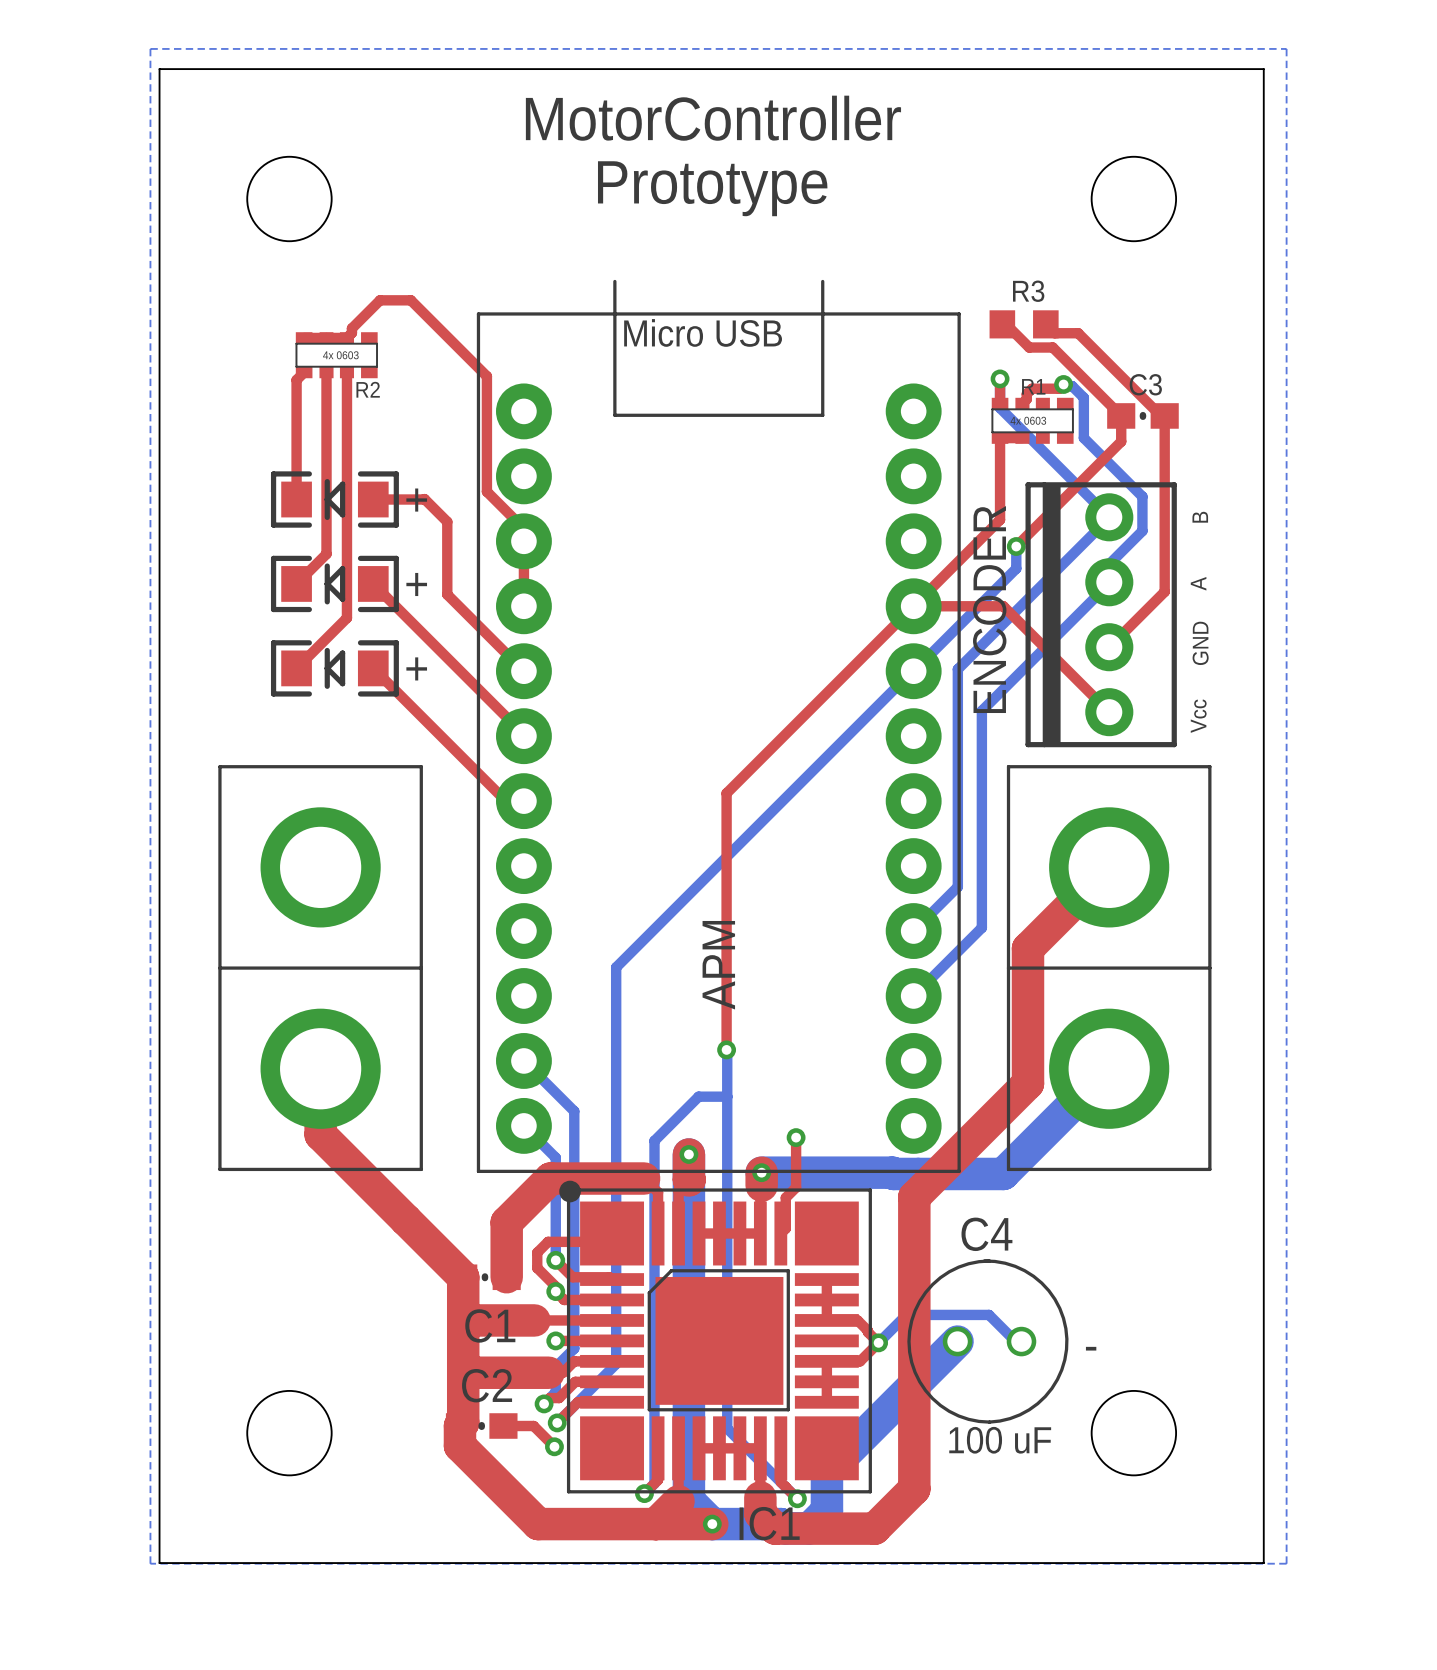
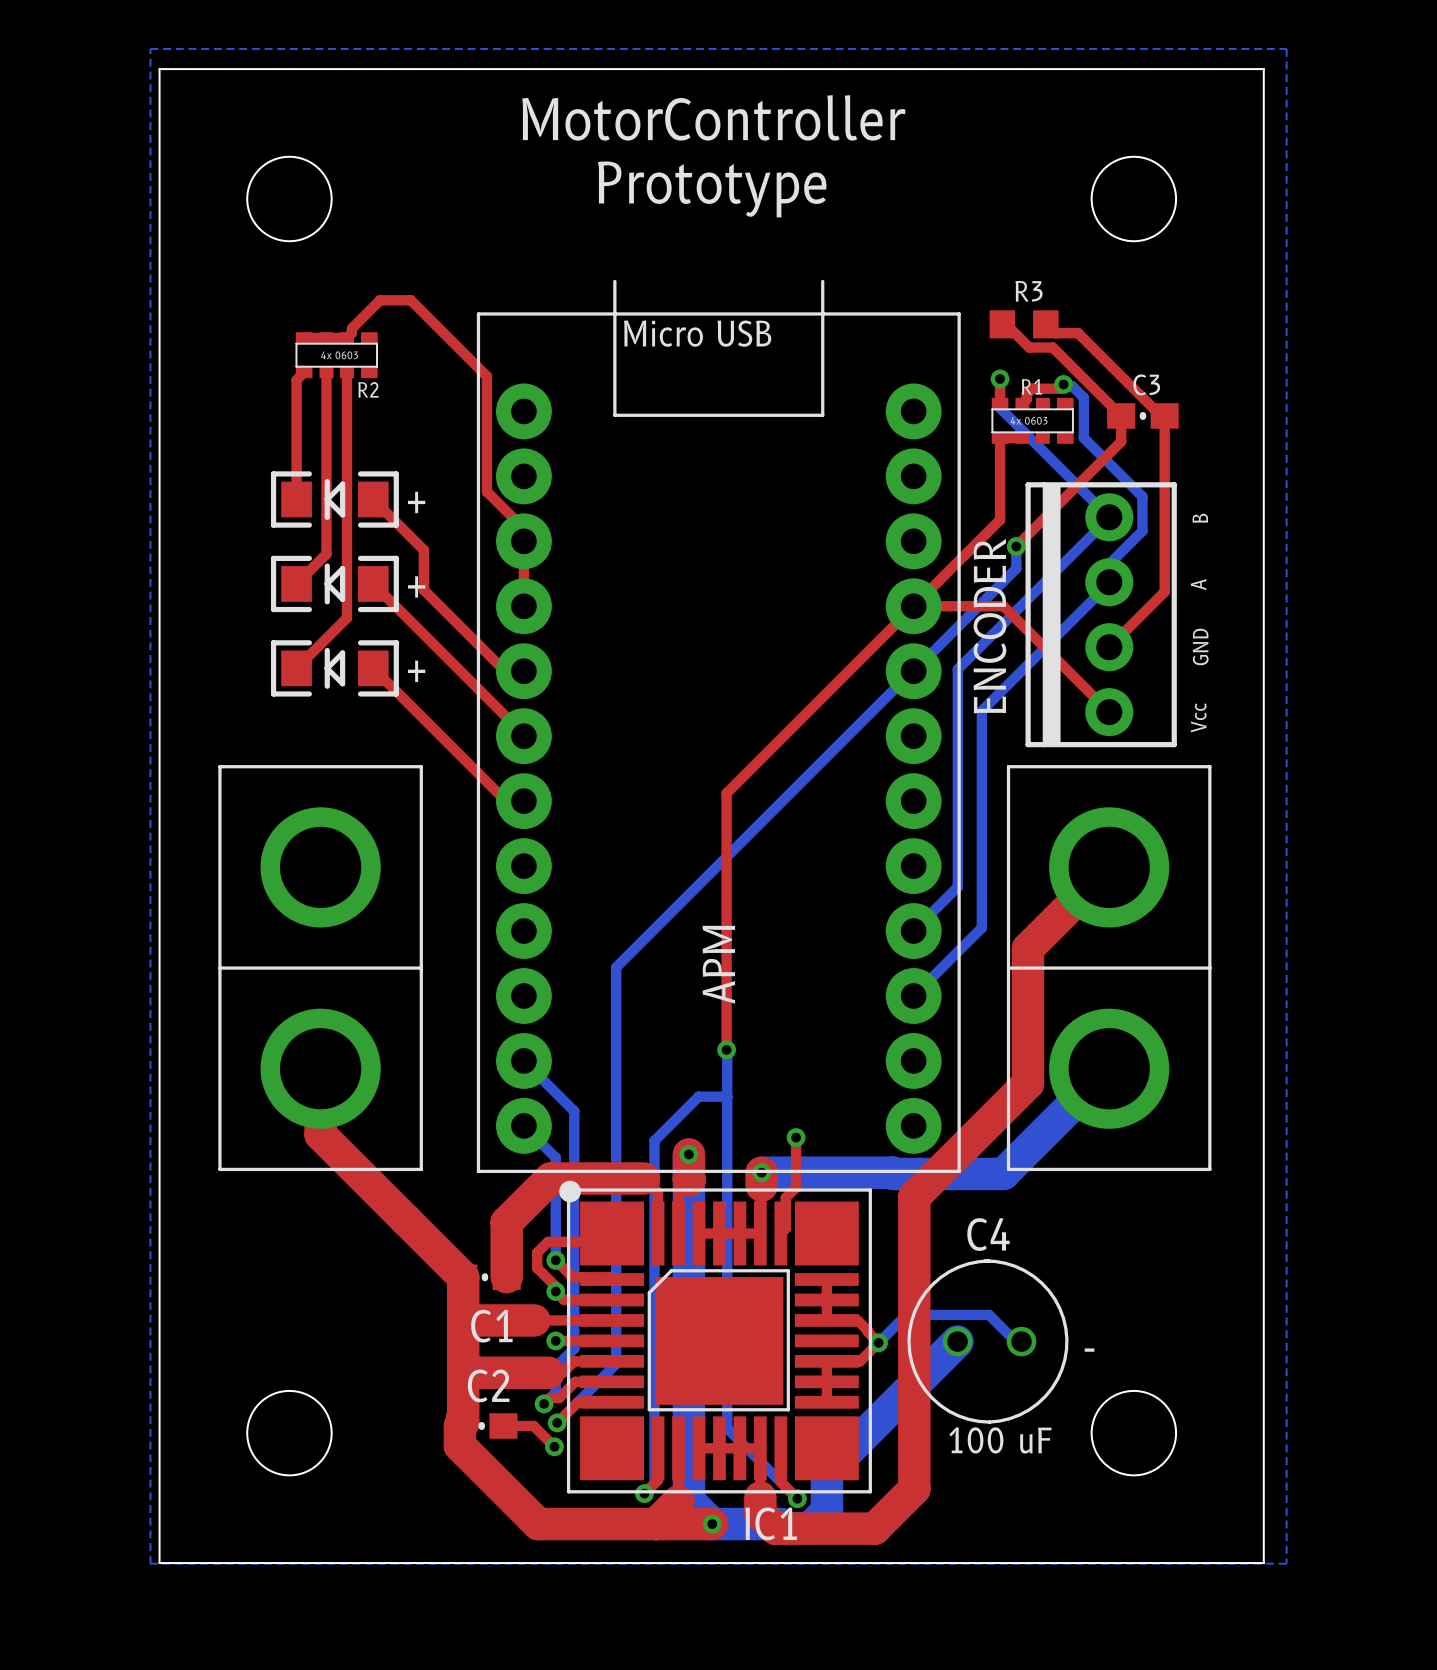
top track: (373, 499) (424, 499) (447, 521) (447, 594) (523, 671) -> (373, 499) (423, 550) (423, 590) (505, 671) (523, 671)

